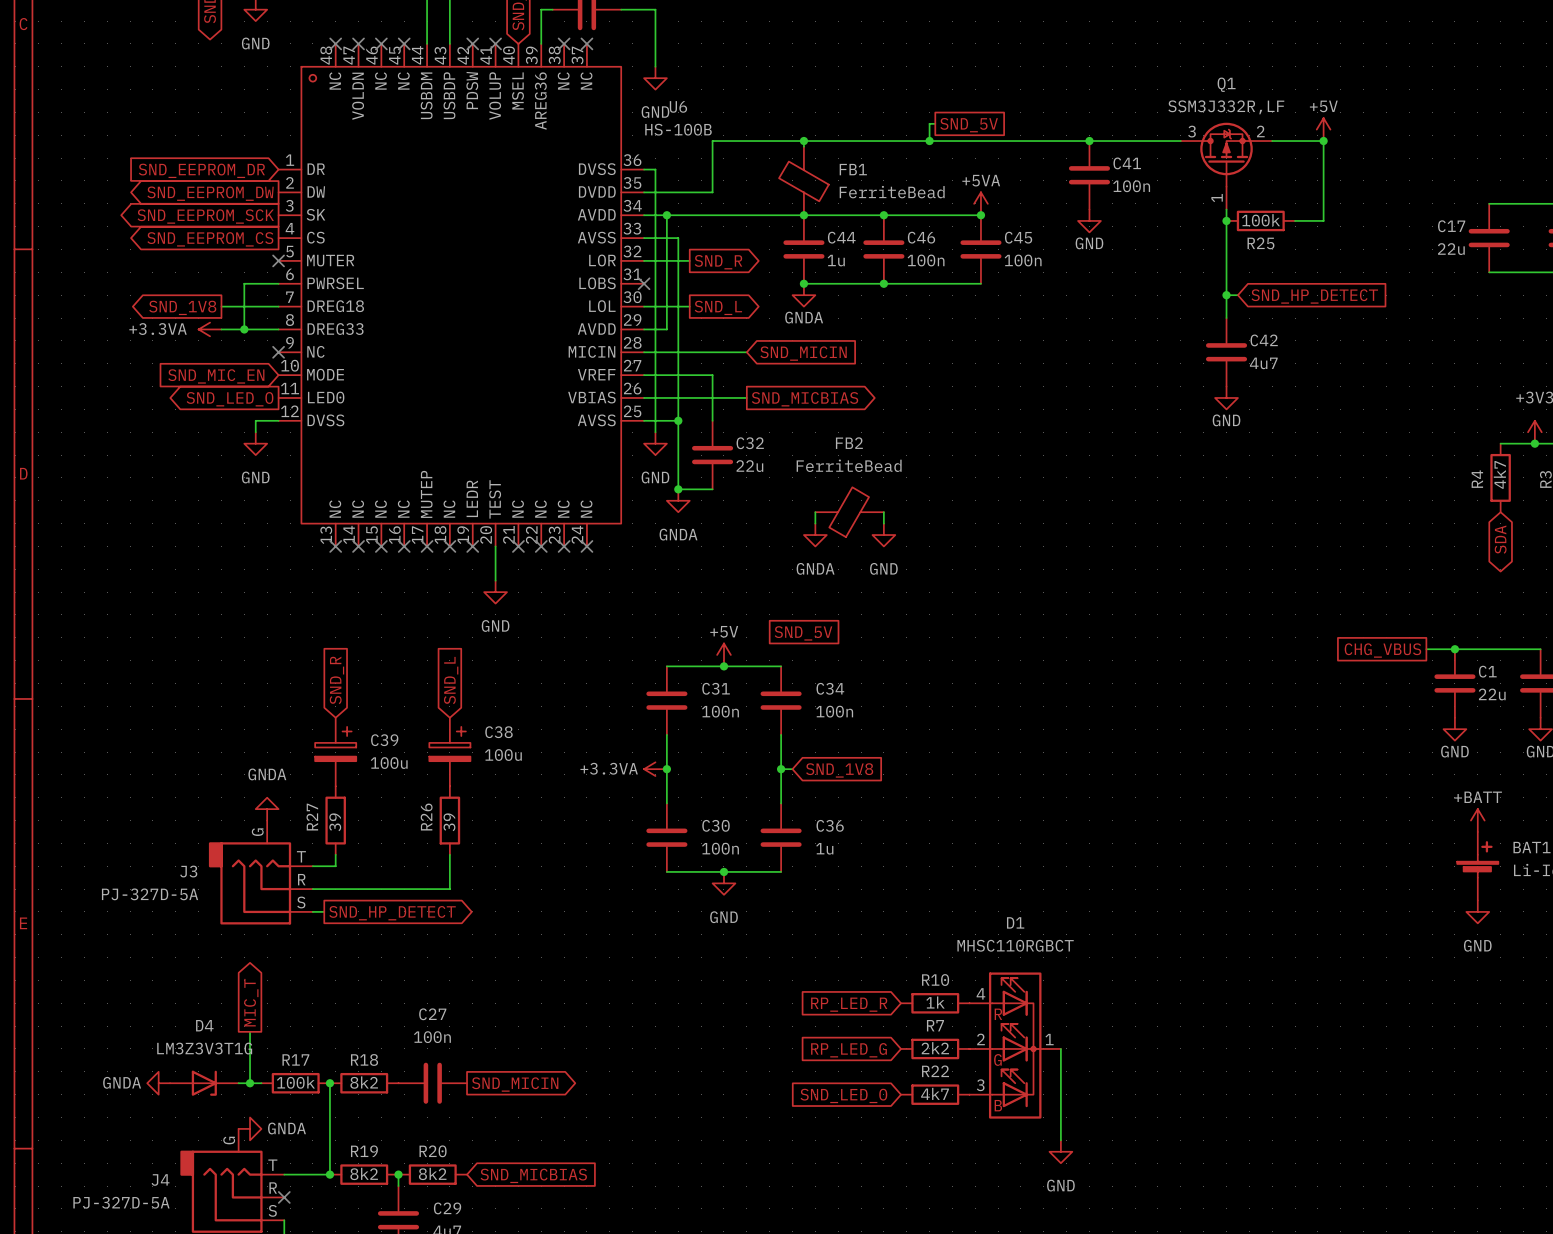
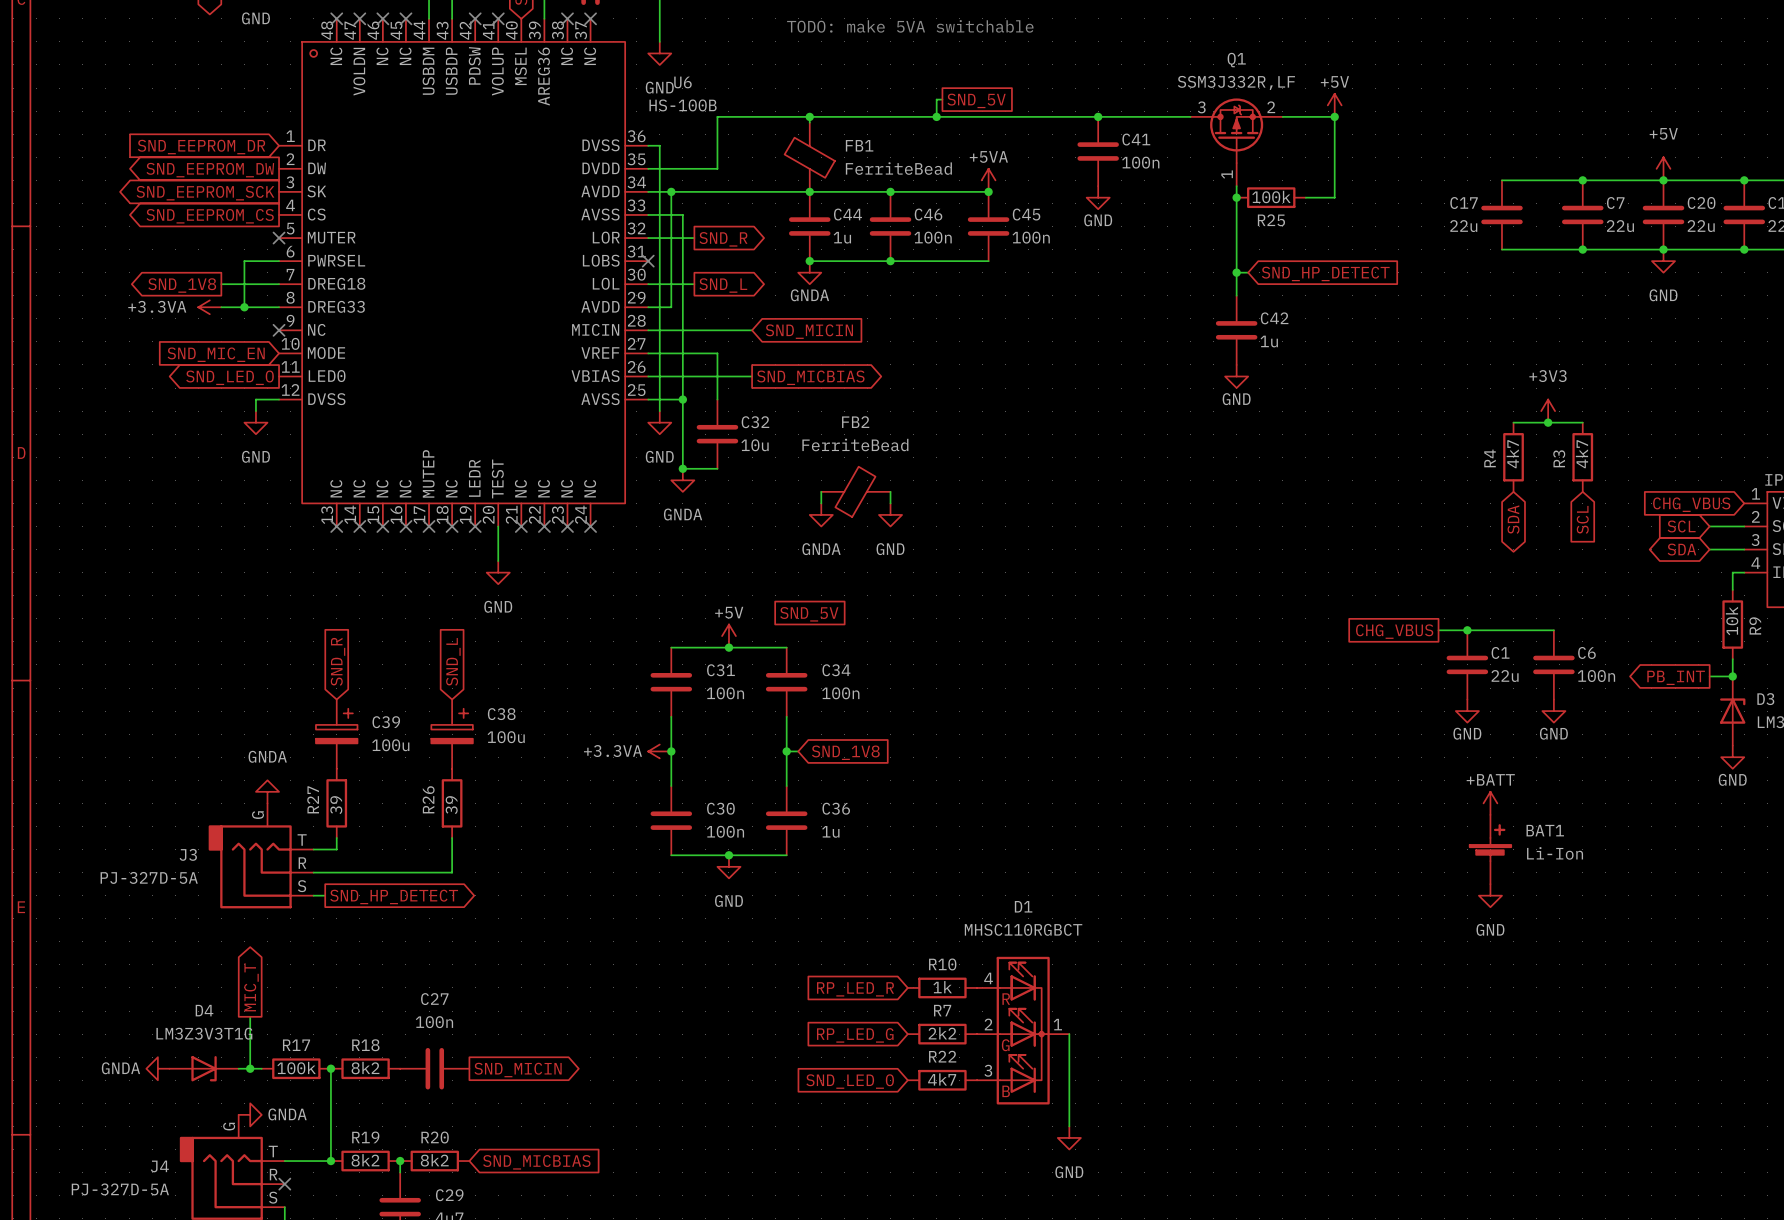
text: none -> TODO: make 5VA switchable (910, 26)
C42 value: 4u7 (1263, 363) -> 1u (1269, 341)
C32 value: 22u (749, 466) -> 10u (755, 445)

